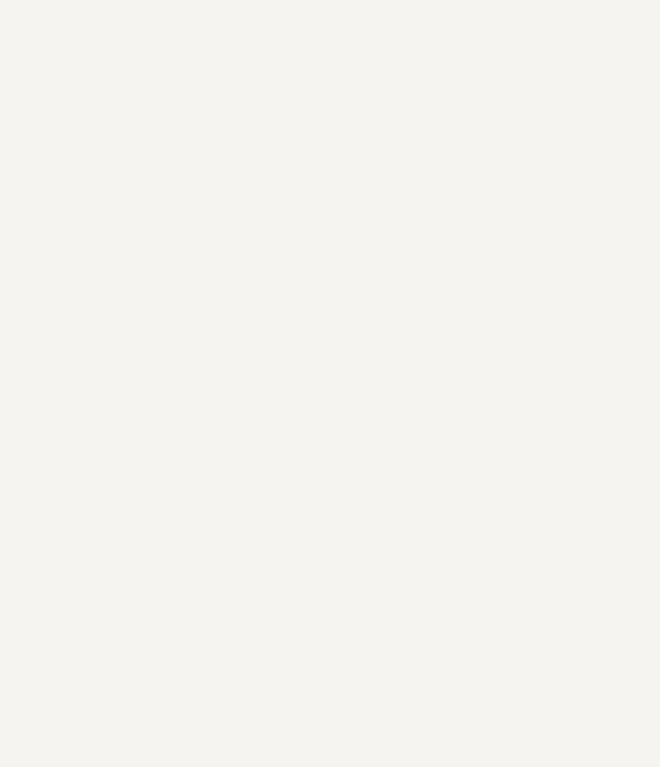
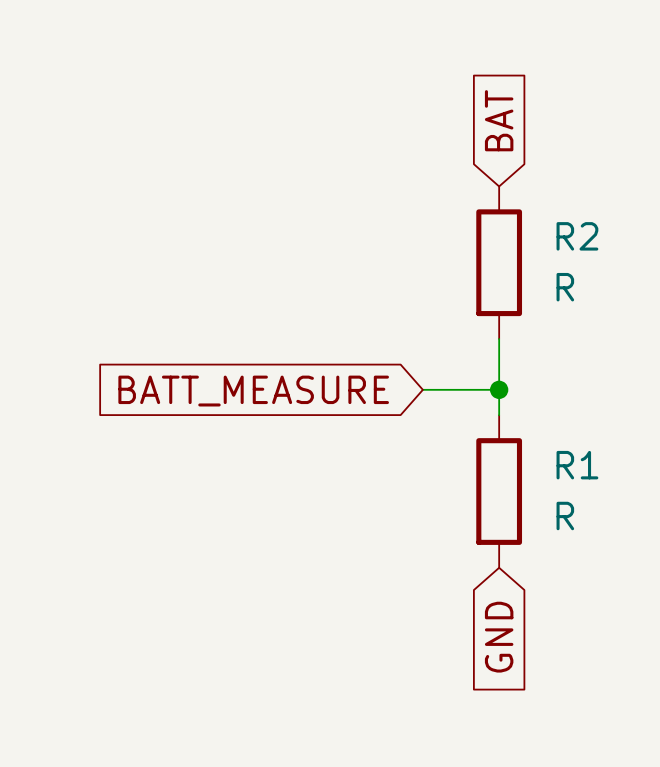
global label: none -> BAT (499, 120)
R2: none -> R (499, 262)
wire: none -> (499, 338) (499, 415)
wire: none -> (422, 389) (499, 389)
junction: none -> (499, 389)
global label: none -> BATT_MEASURE (253, 391)
R1: none -> R (499, 491)
global label: none -> GND (499, 637)

